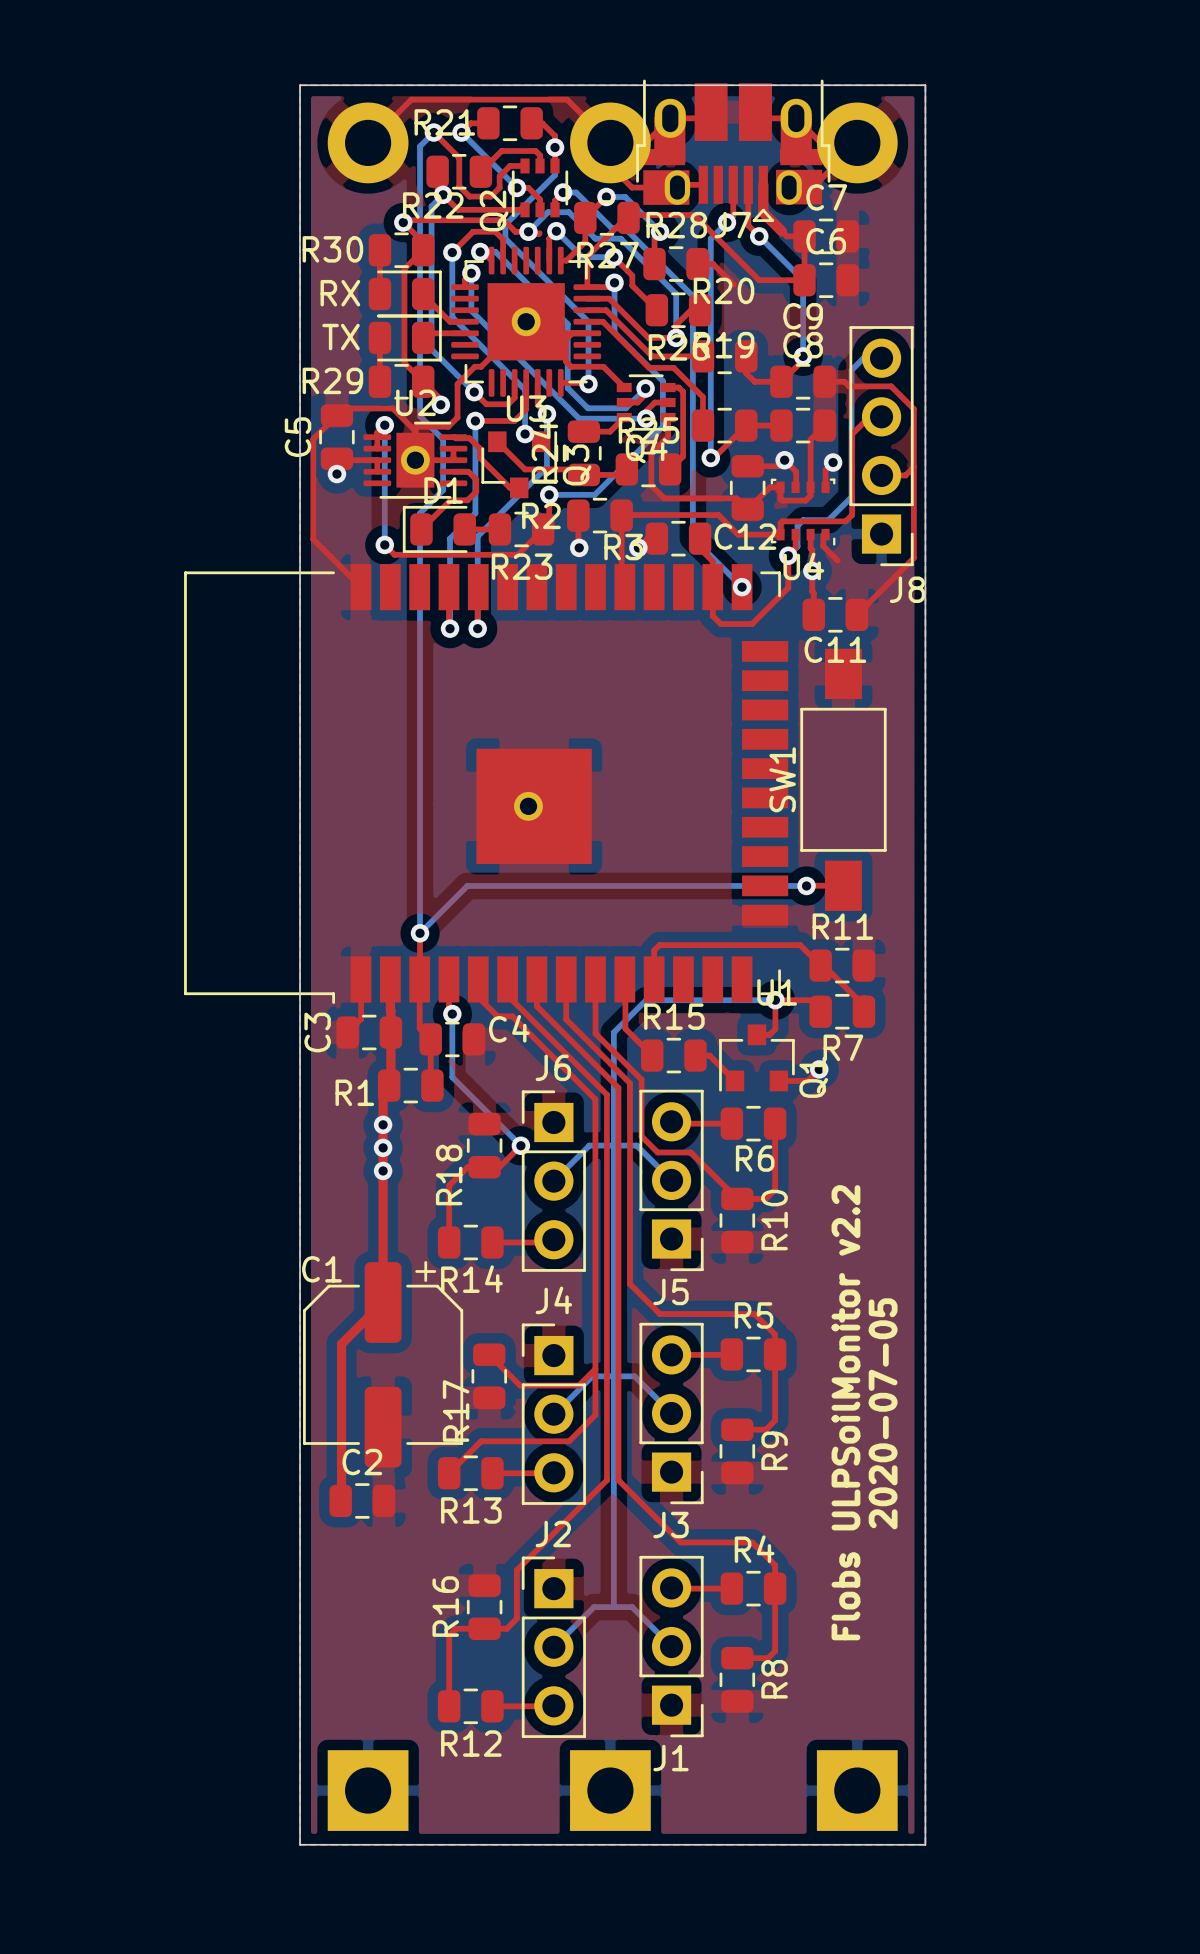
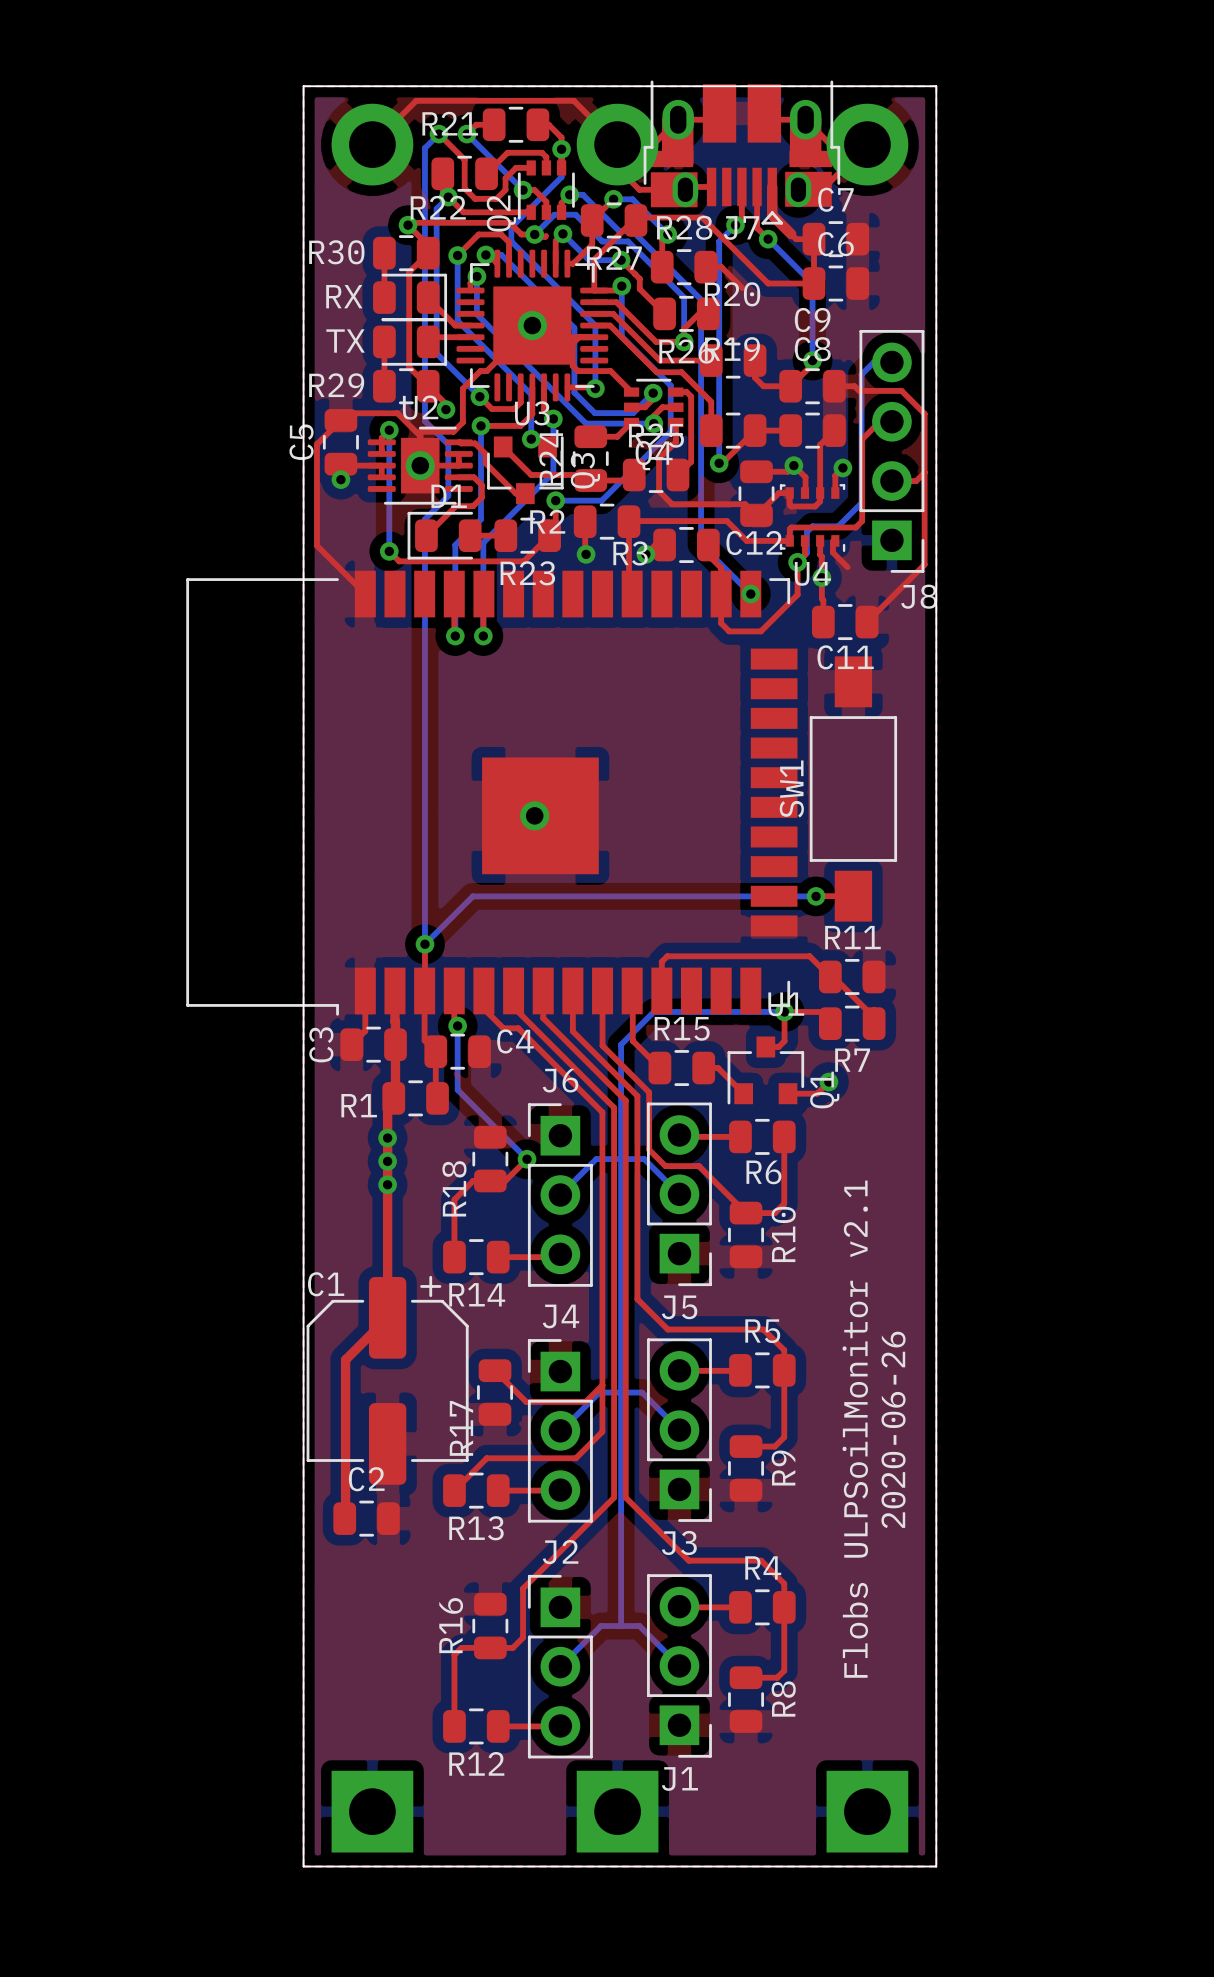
text: Flobs ULPSoilMonitor v2.2 (845, 1412) -> Flobs ULPSoilMonitor v2.1 (855, 1429)
text: 2020-07-05 (883, 1413) -> 2020-06-26 (893, 1429)

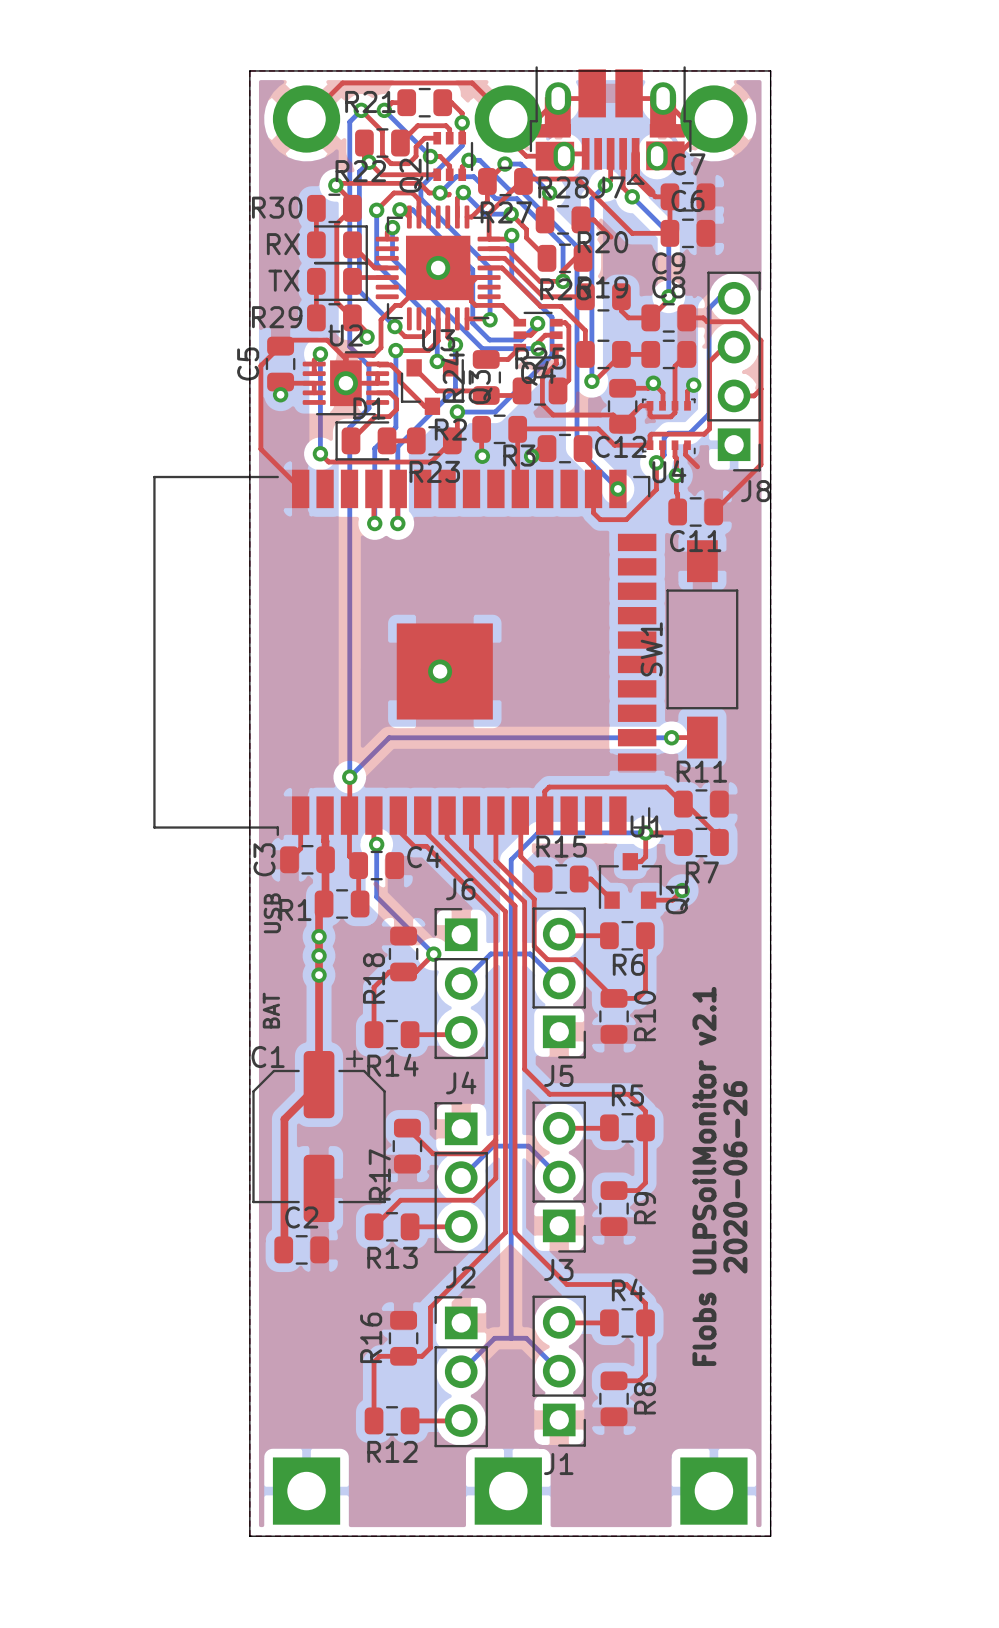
text: none -> USB (272, 913)
text: none -> BAT (271, 1010)

